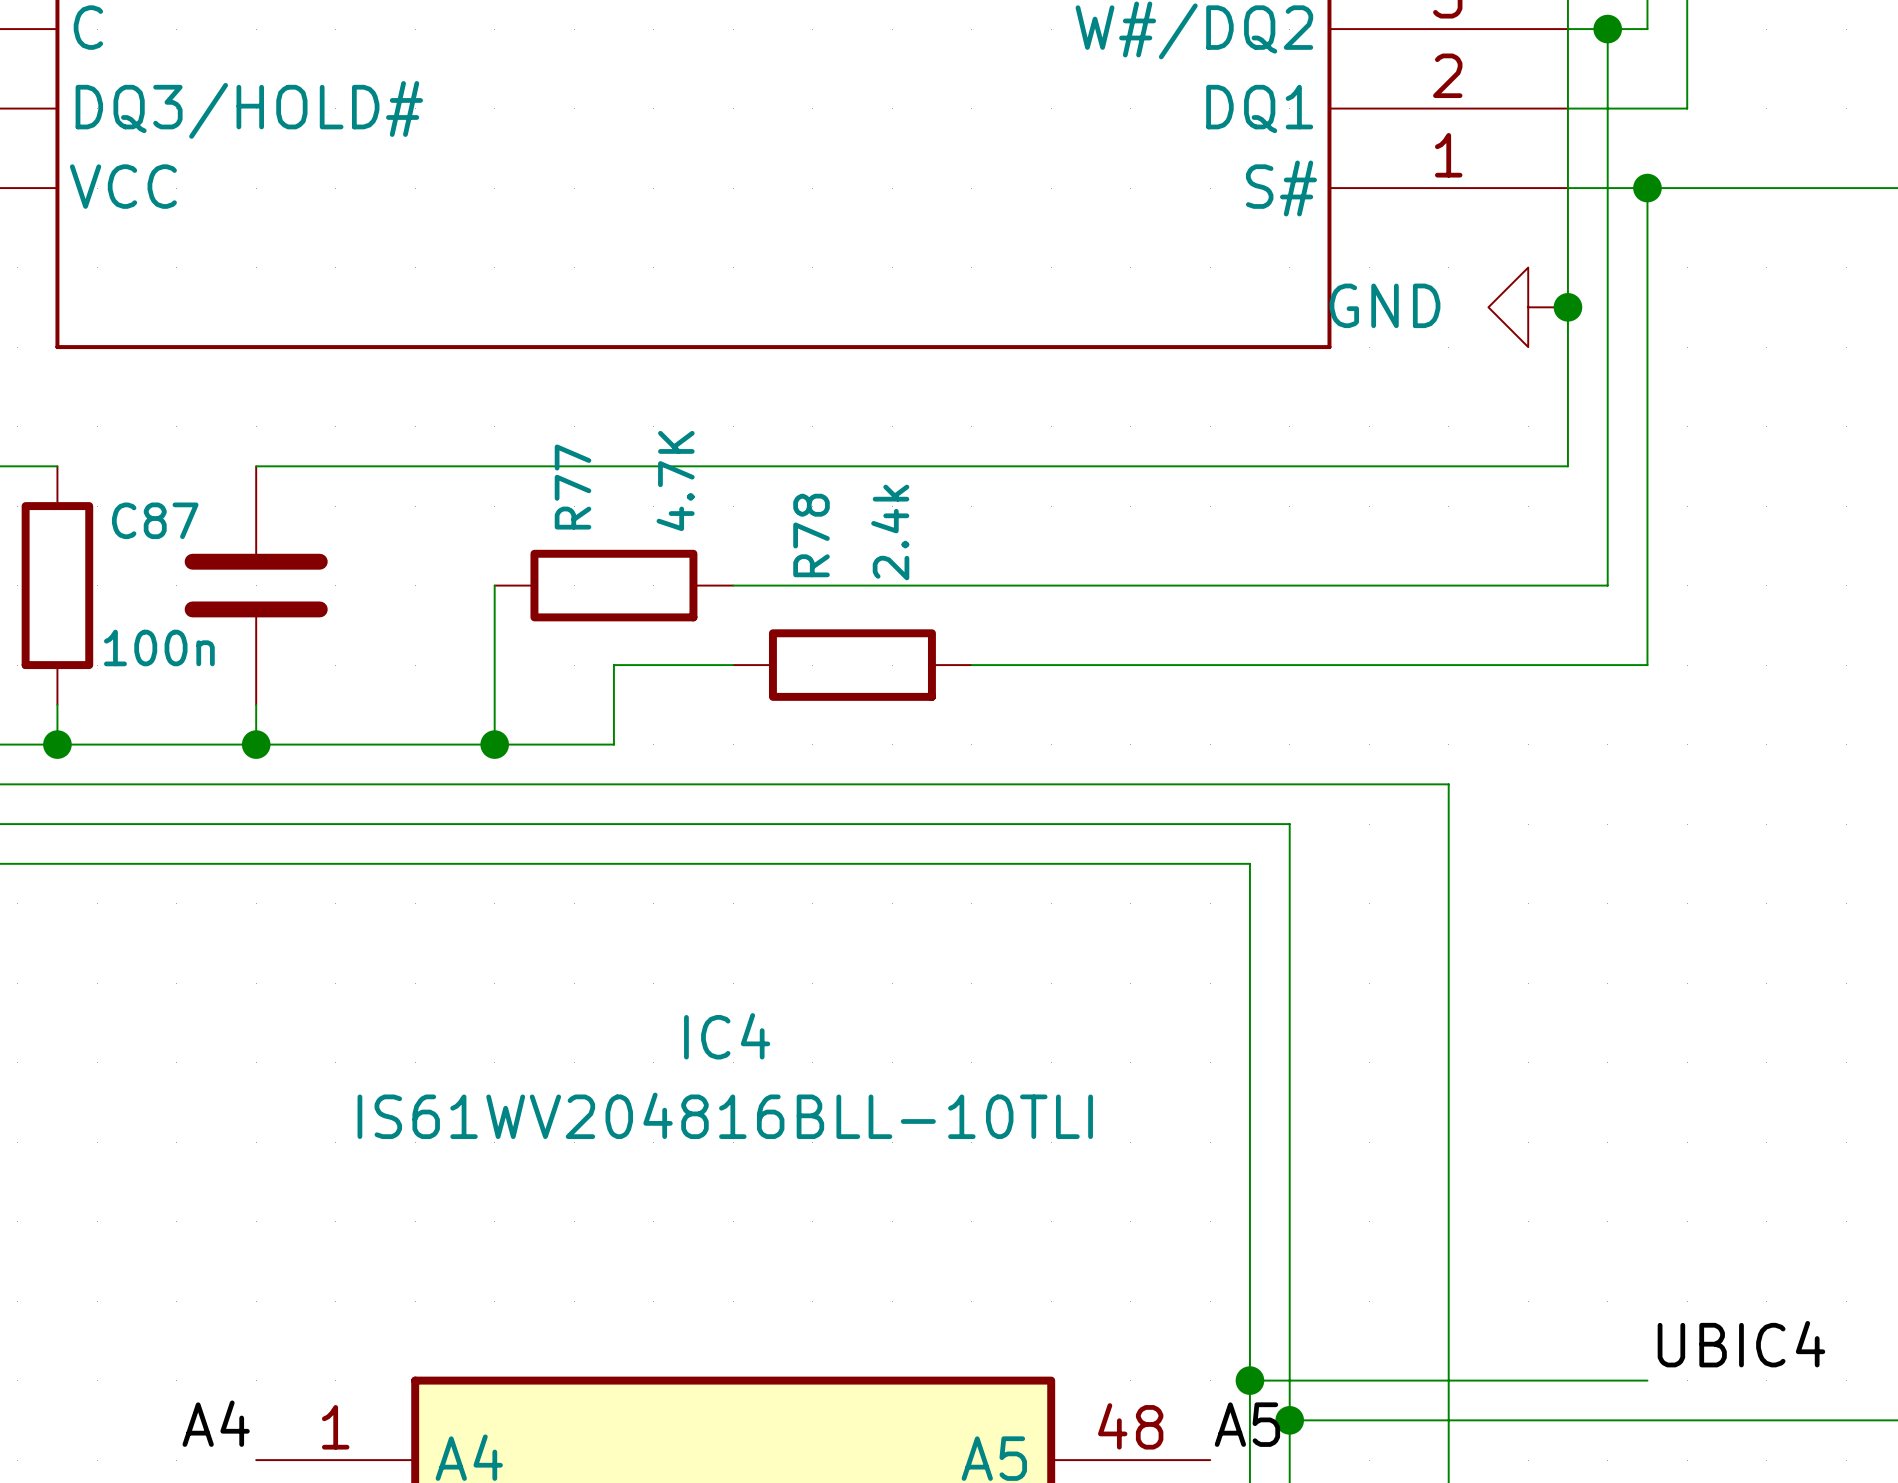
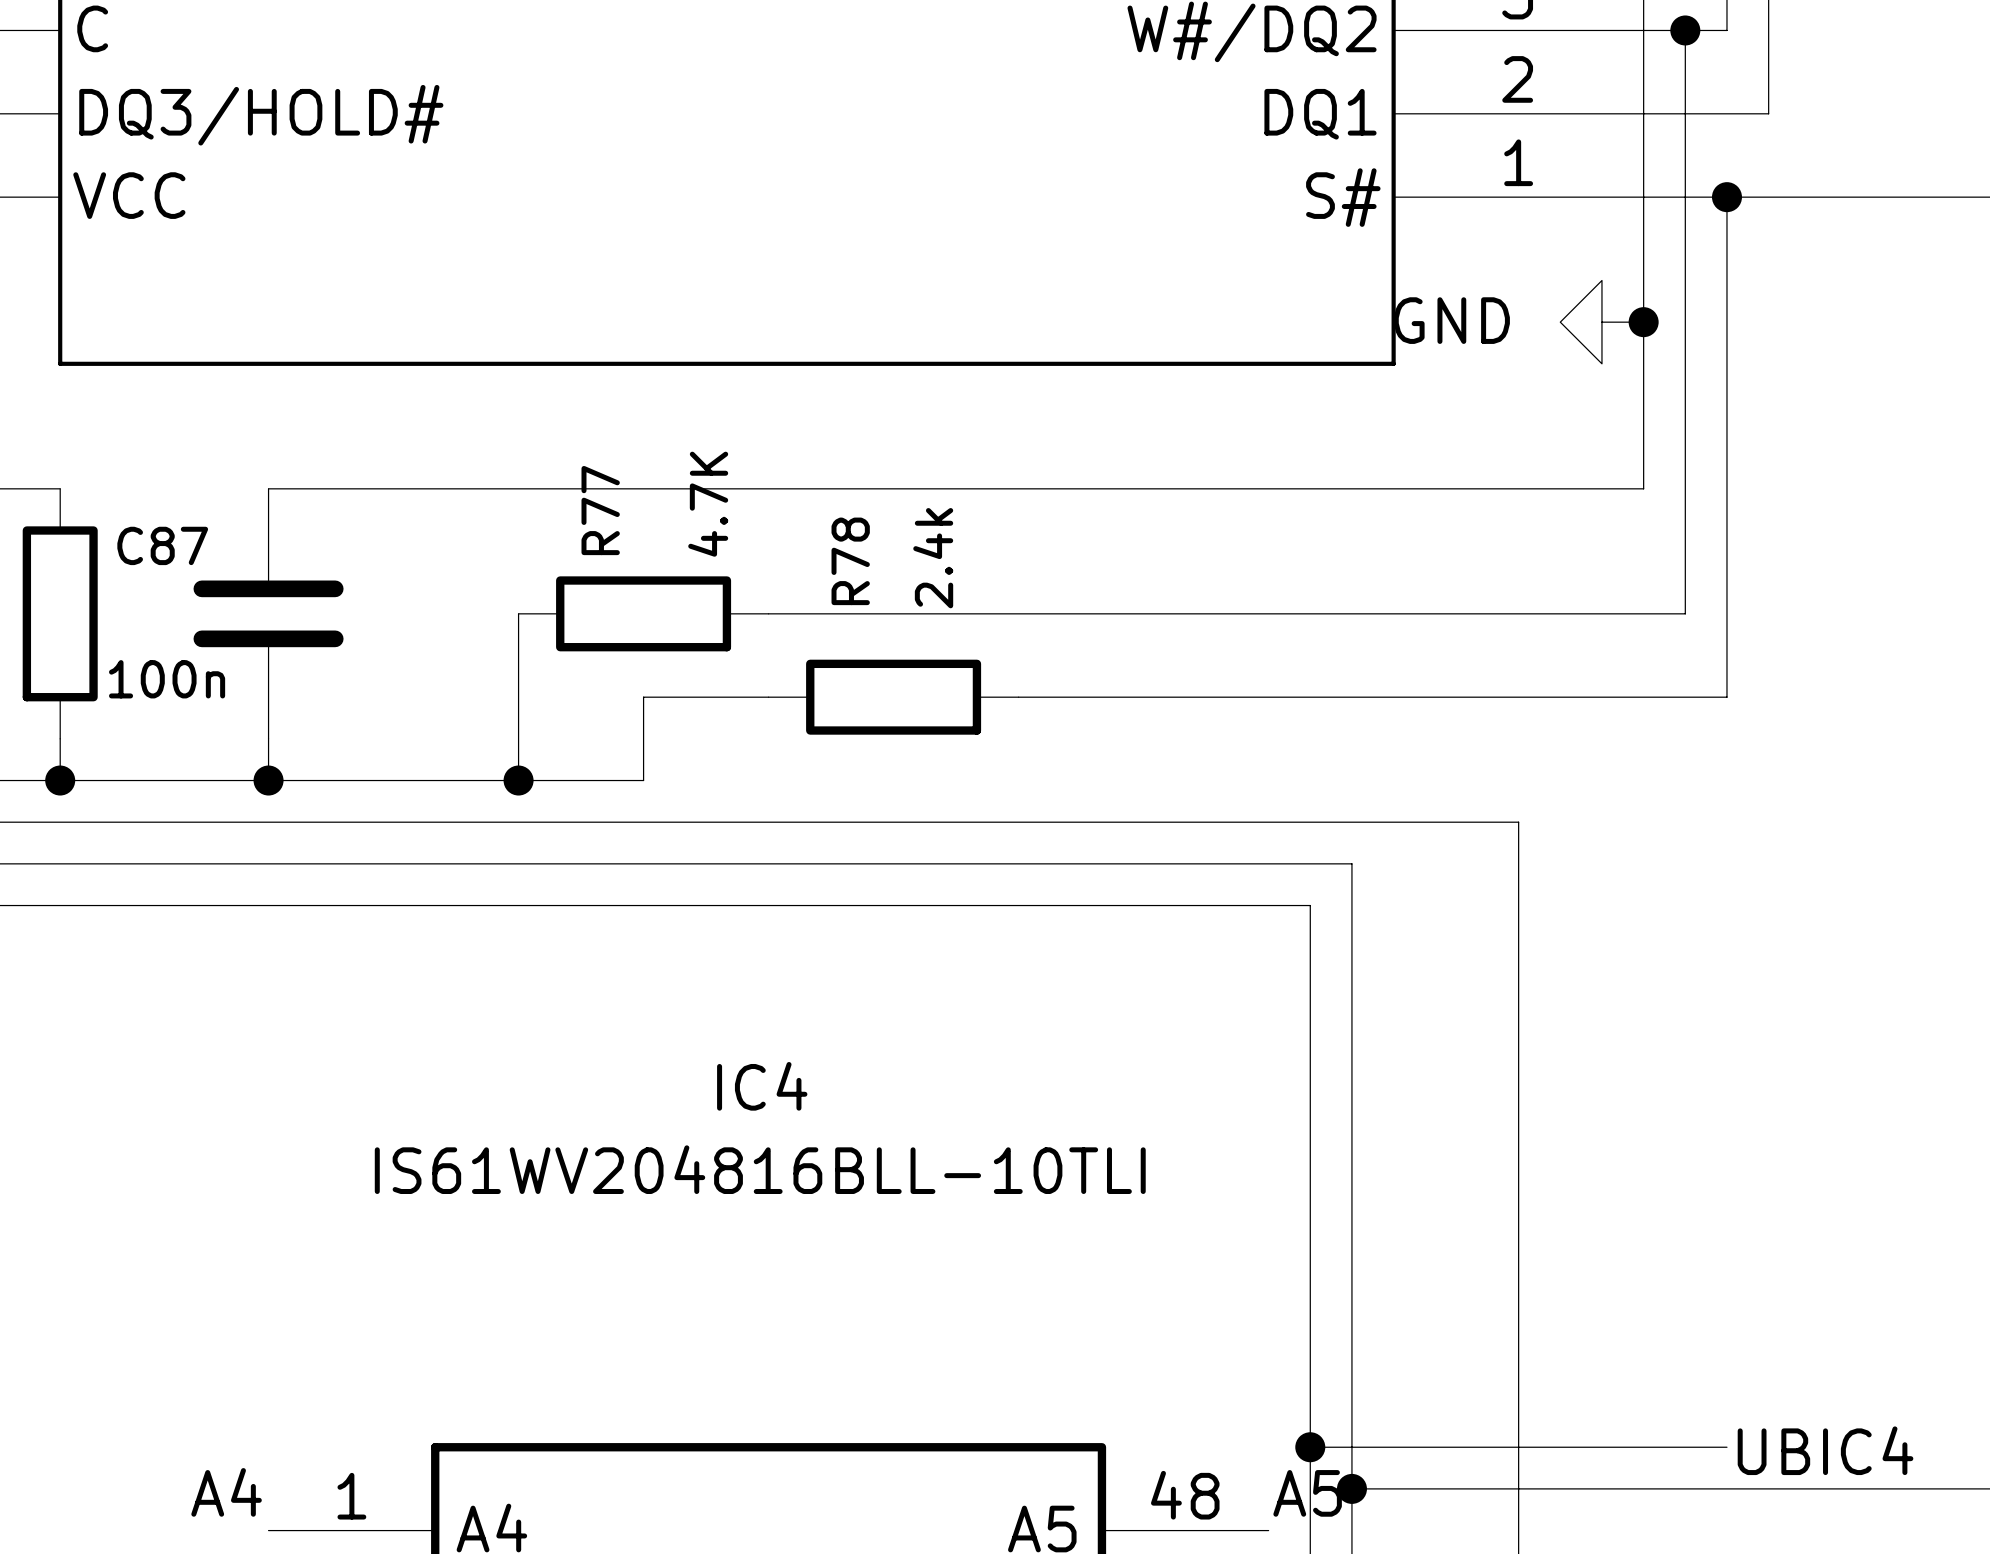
label position: UBIC4 (1741, 1344) -> UBIC4 (1825, 1450)

